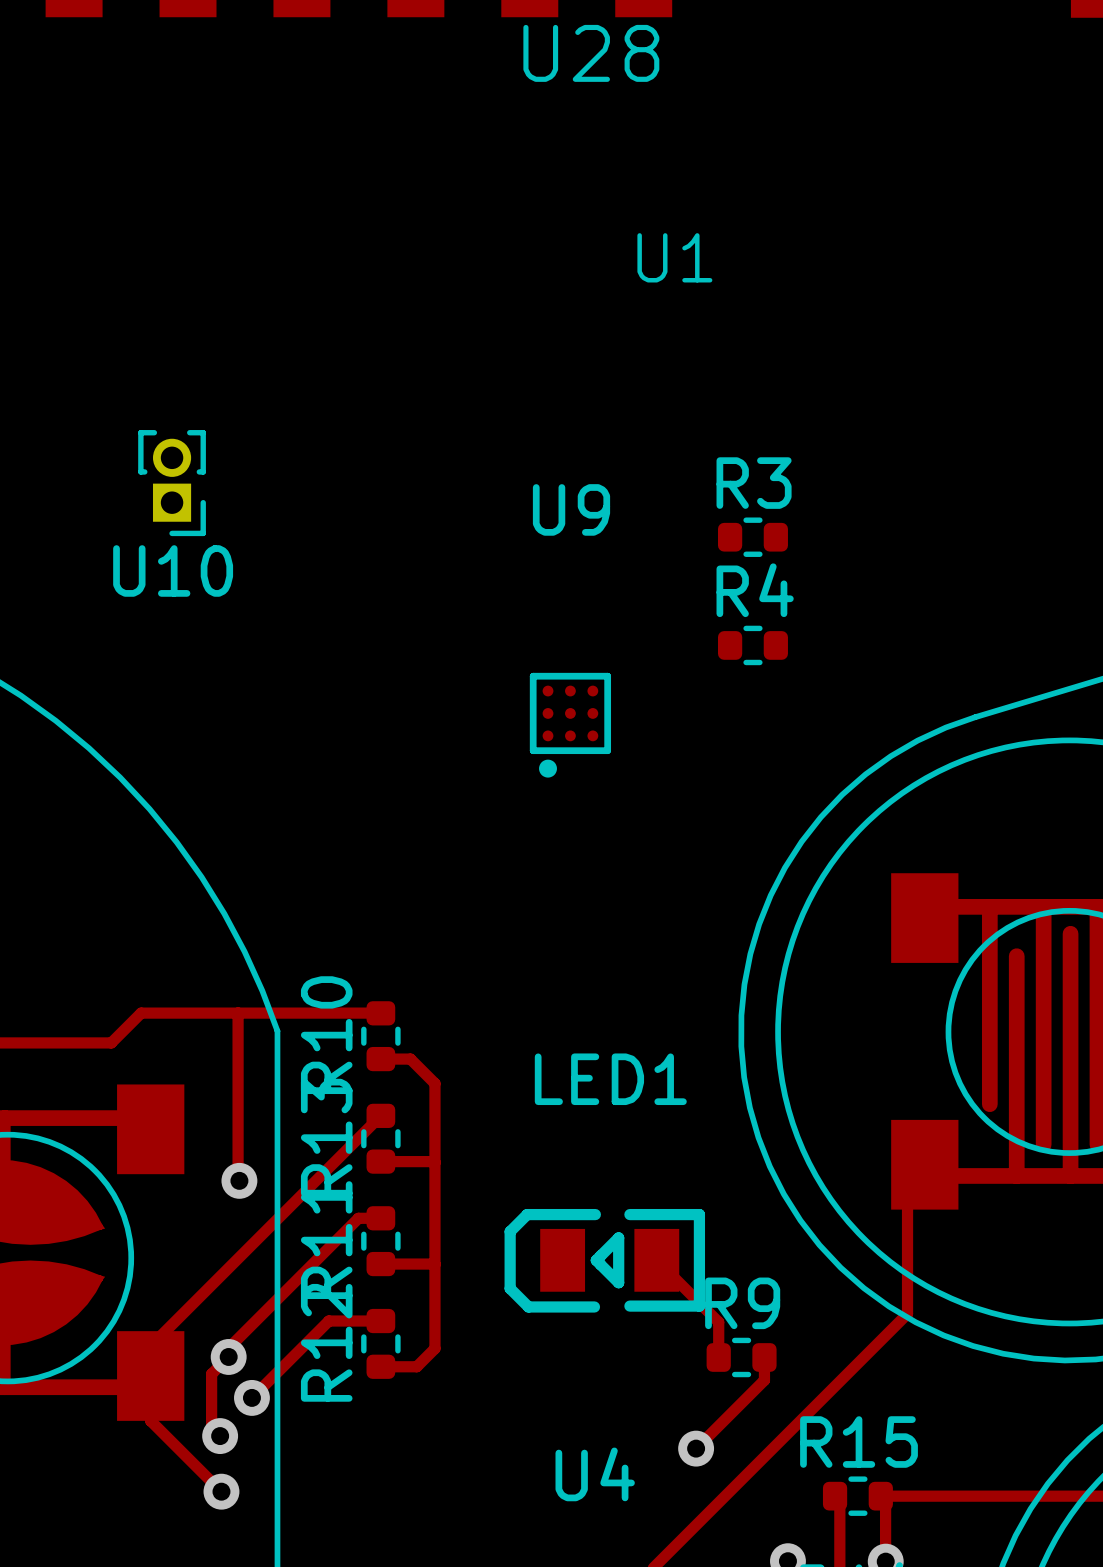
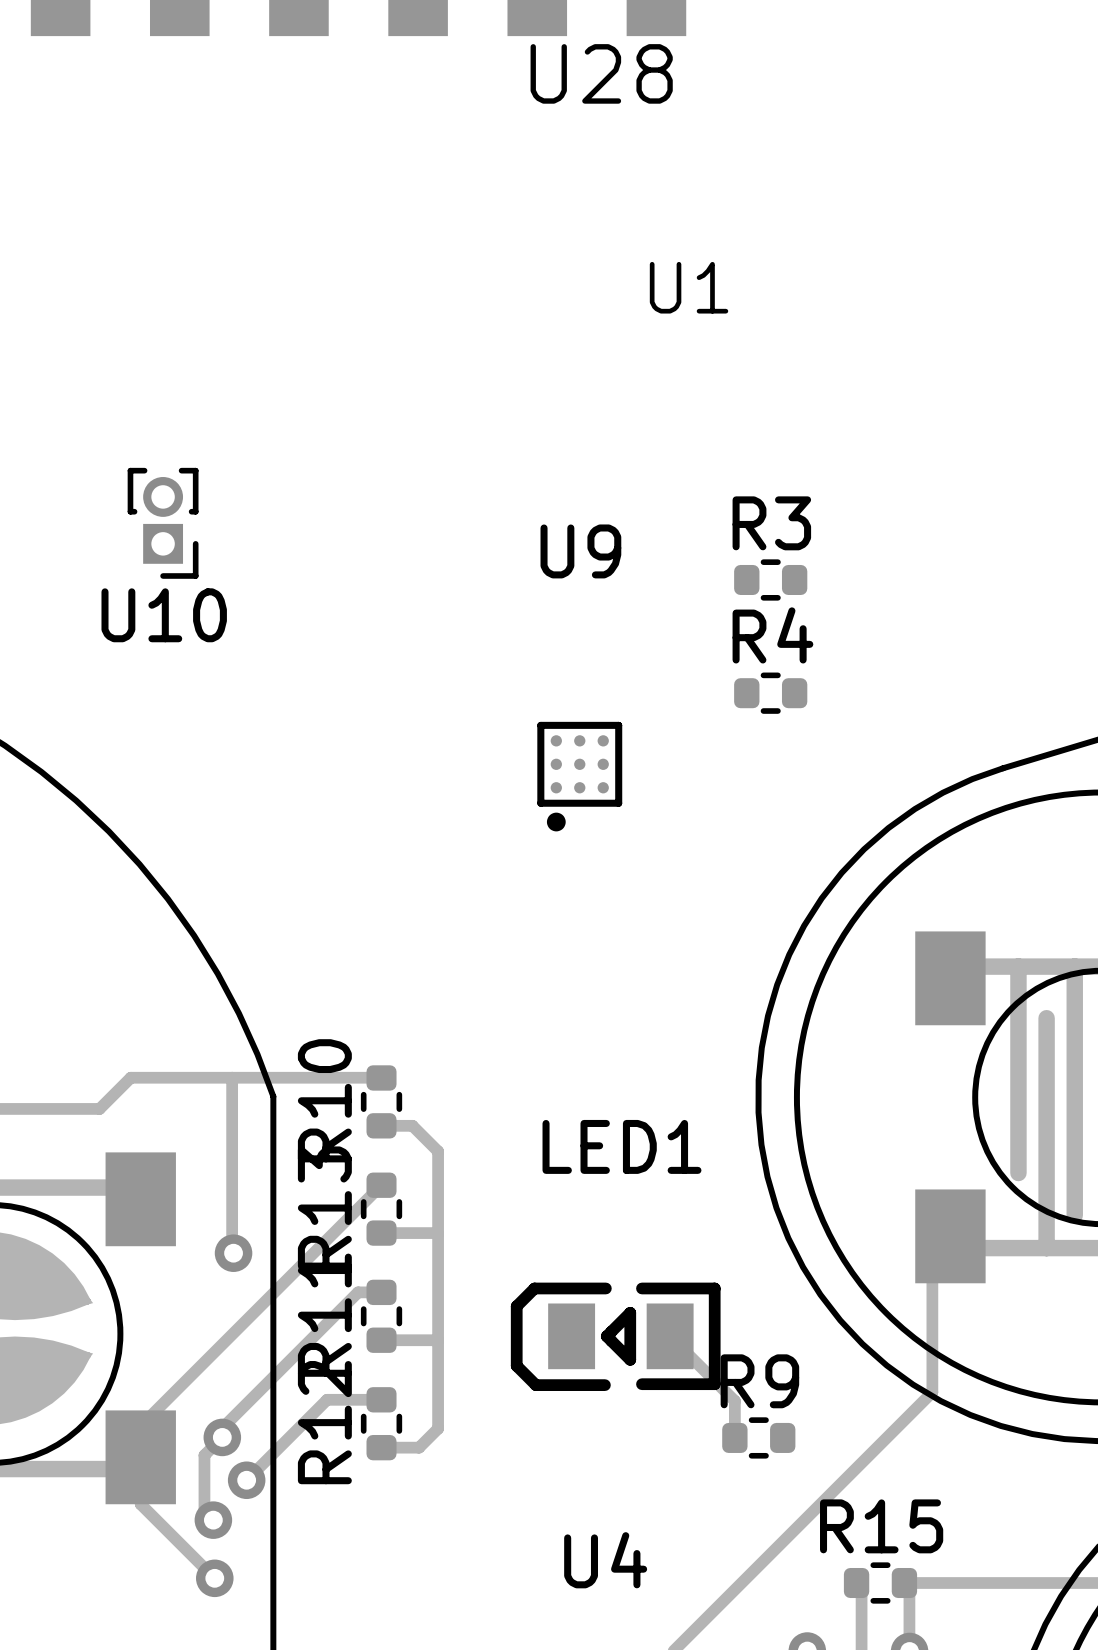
track: (764, 1357) (764, 1380) (696, 1448) -> none
via: (696, 1448) -> none

